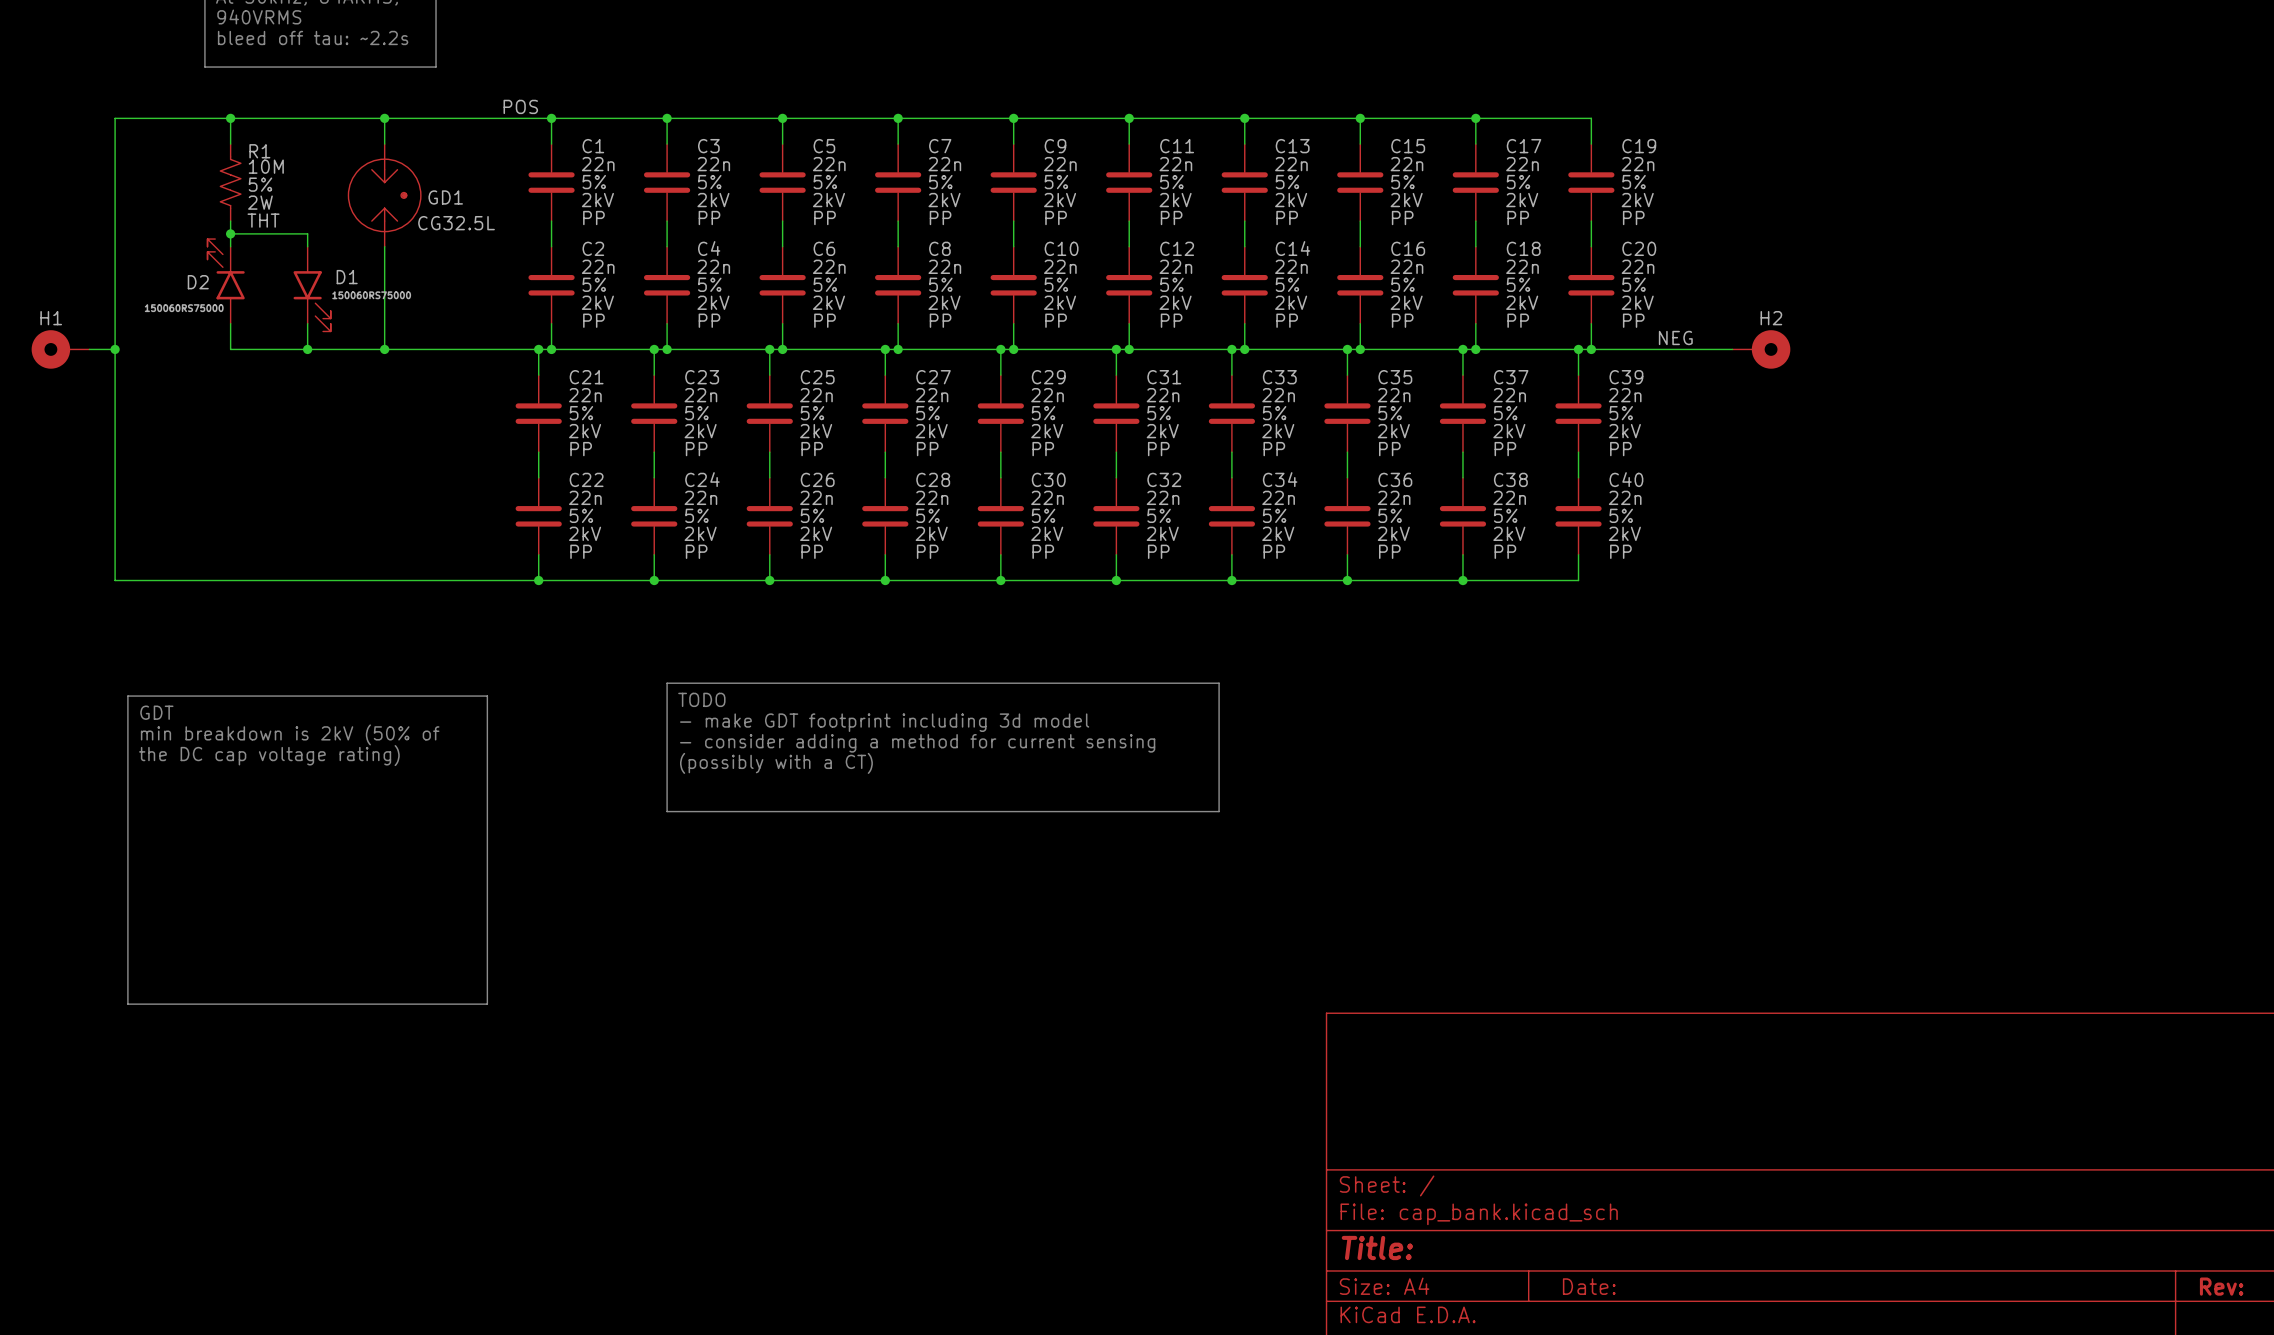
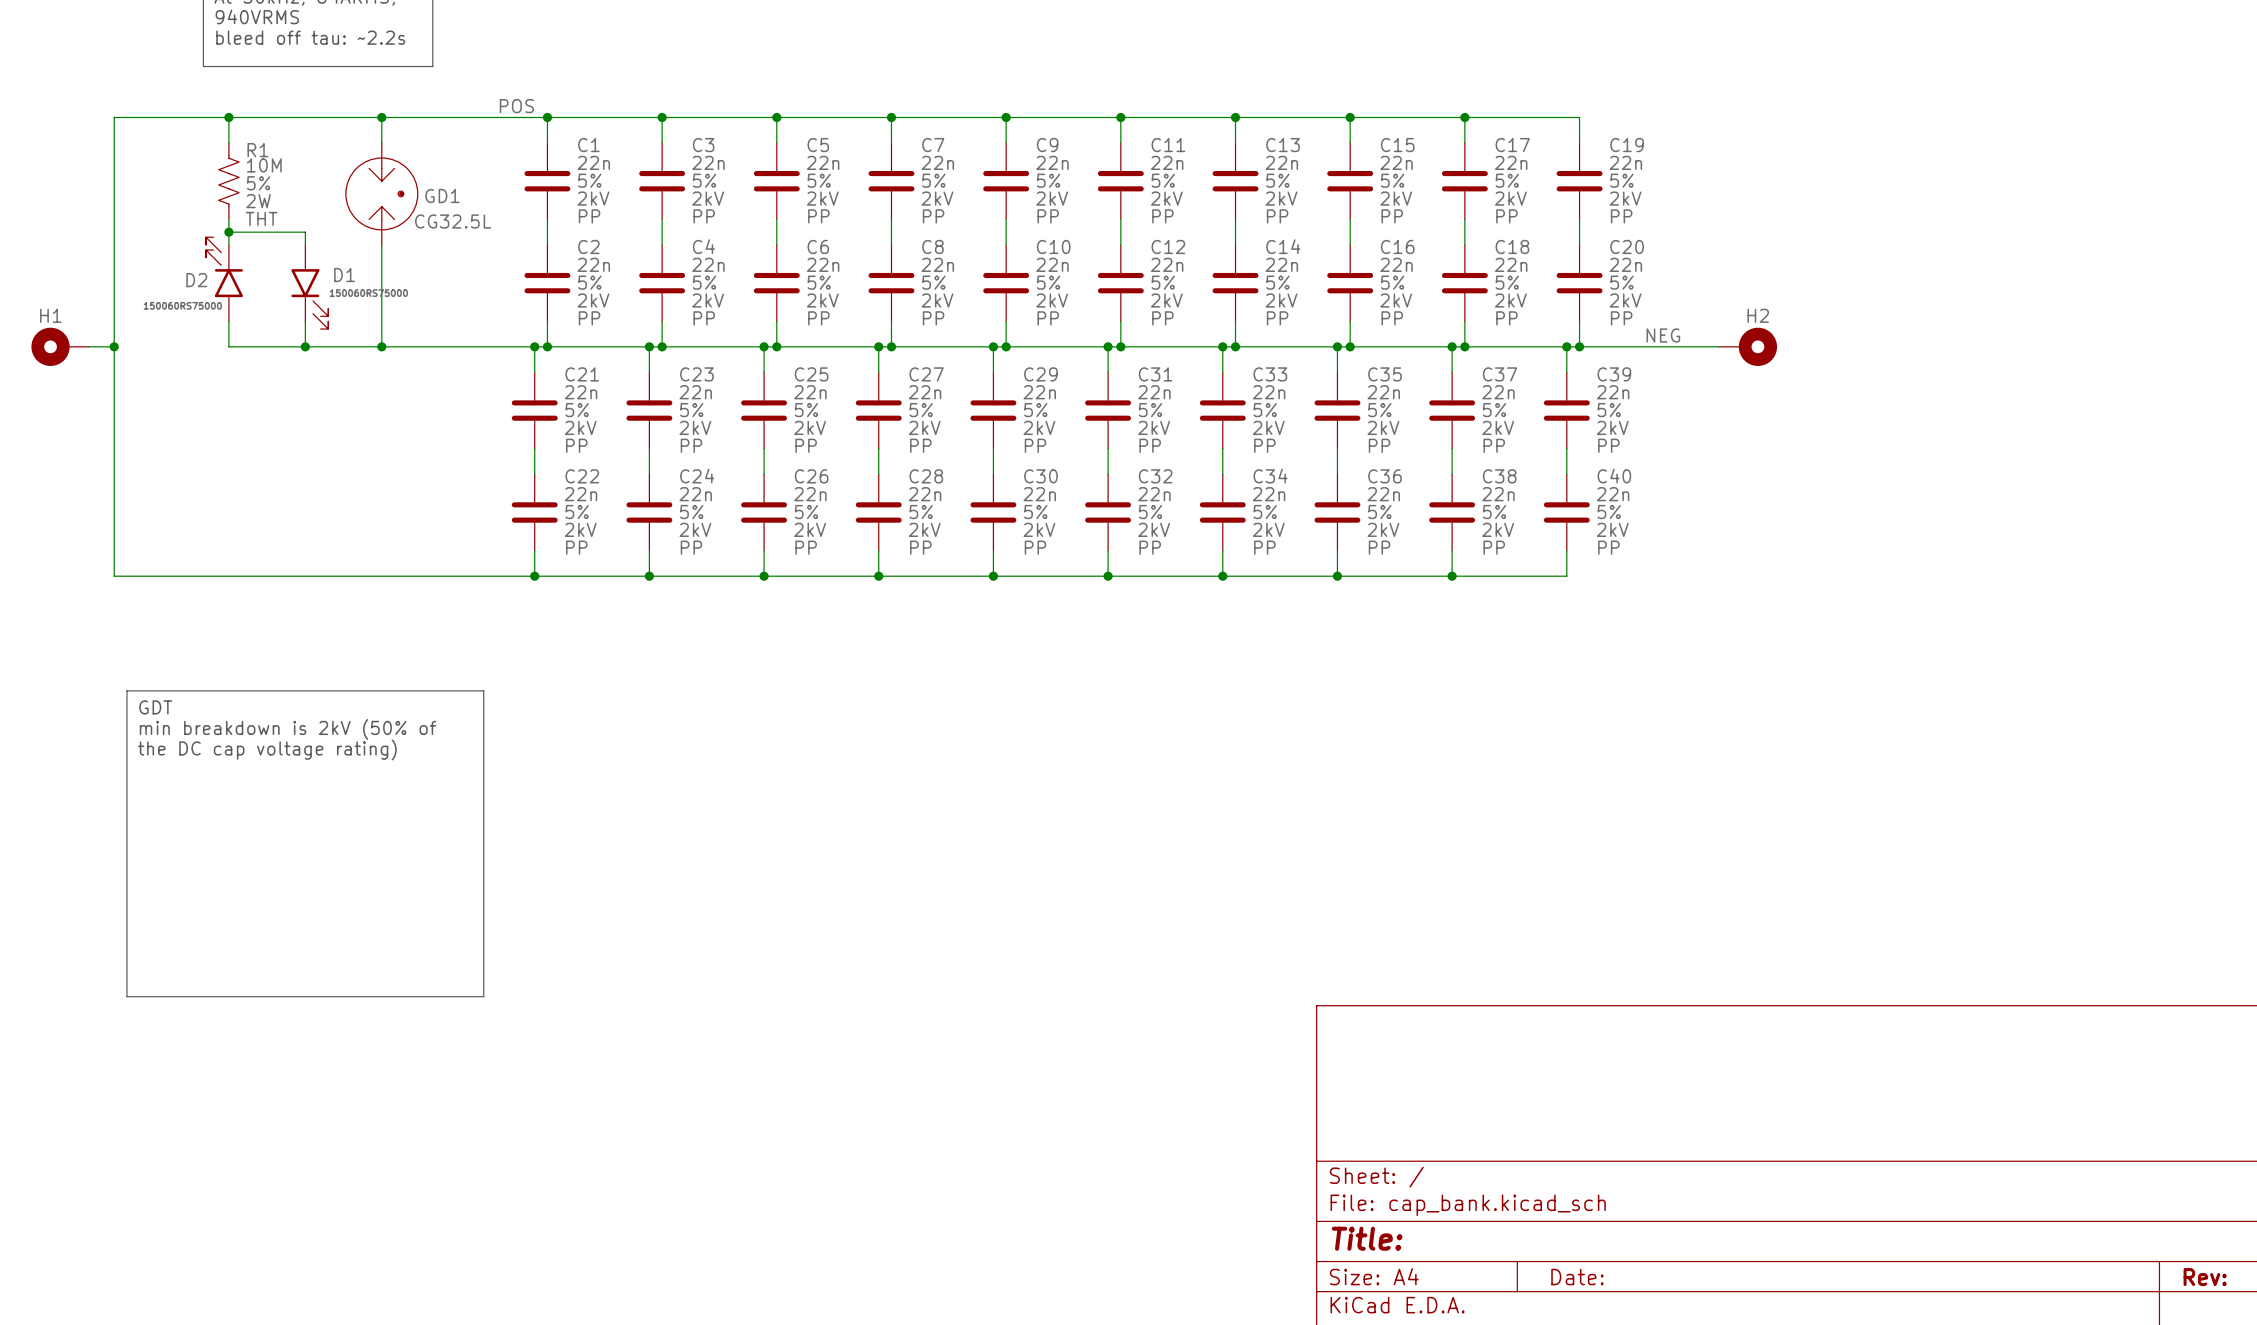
line: (667, 683) (1219, 683) (1219, 811) (667, 811) (667, 683) -> none
text: TODO (701, 699) -> none
text: - make GDT footprint including 3d model (884, 722) -> none
text: - consider adding a method for current sensing (917, 743) -> none
text: (possibly with a CT) (776, 763) -> none

